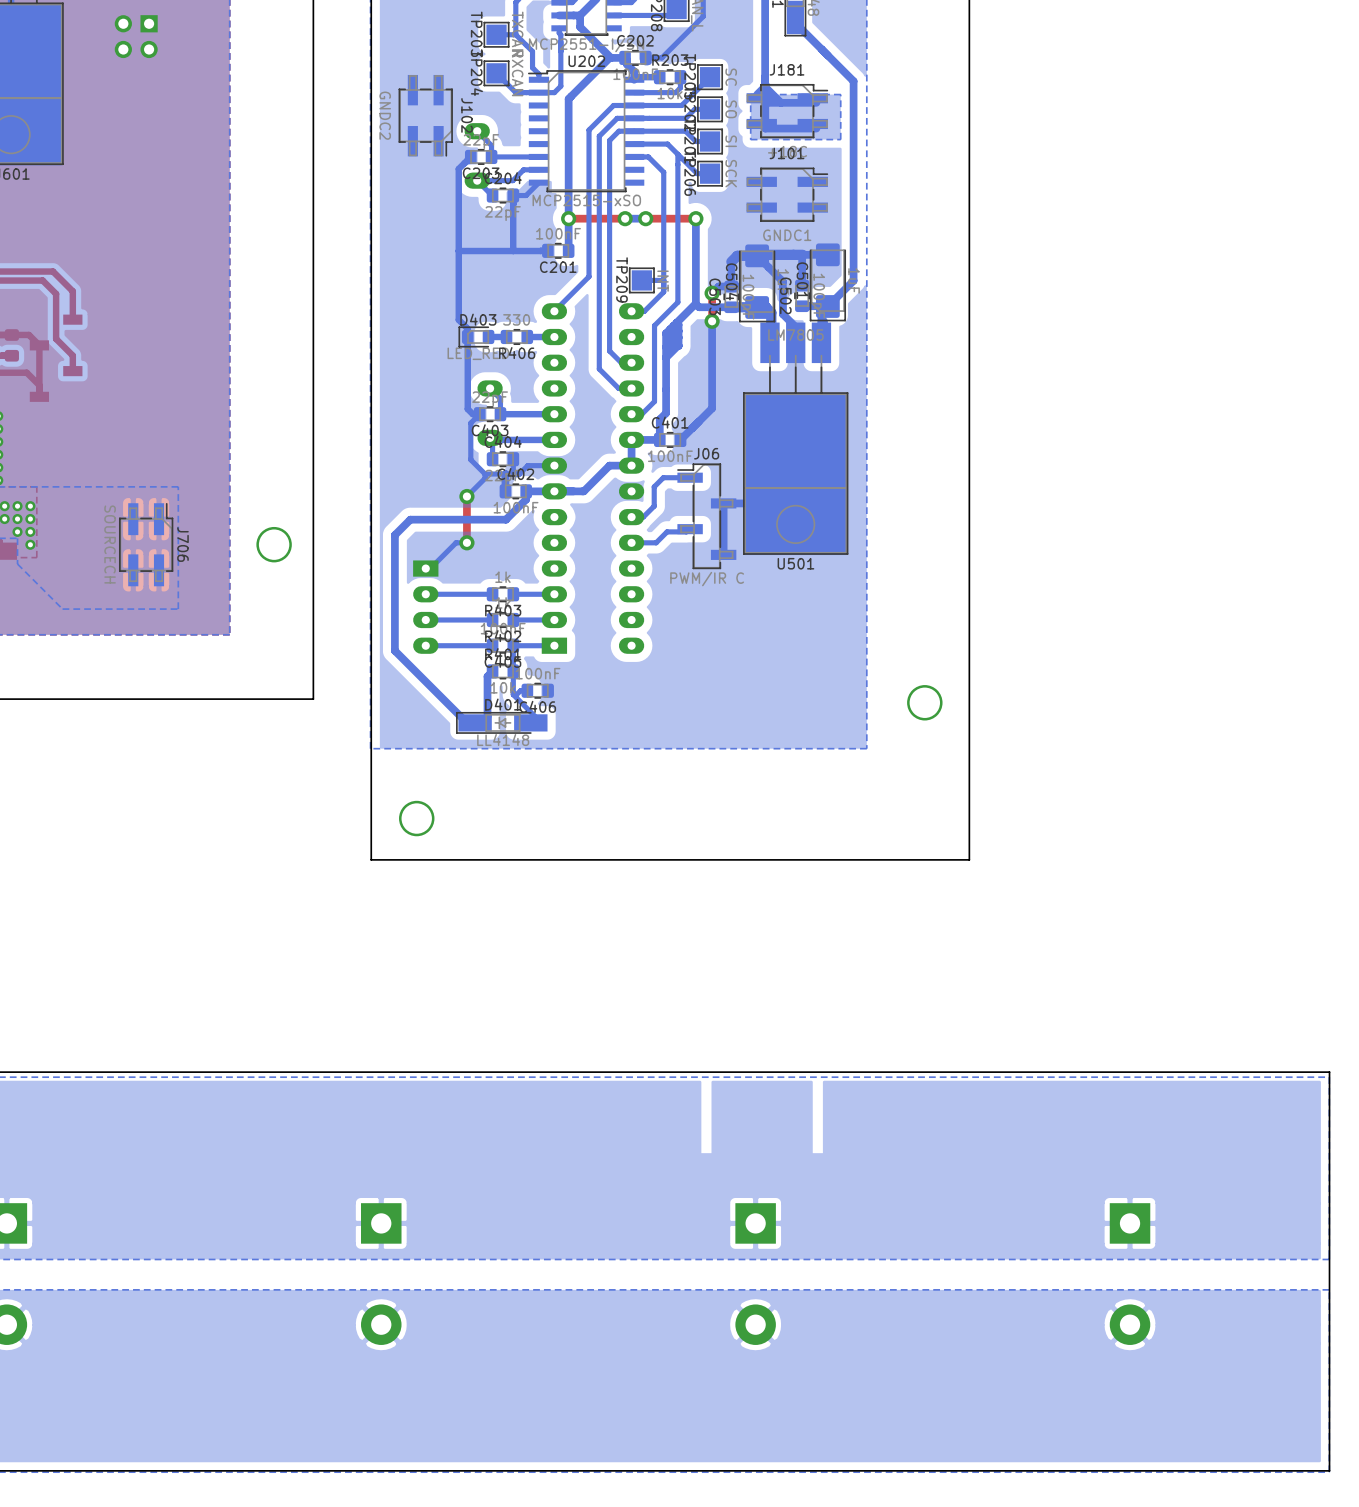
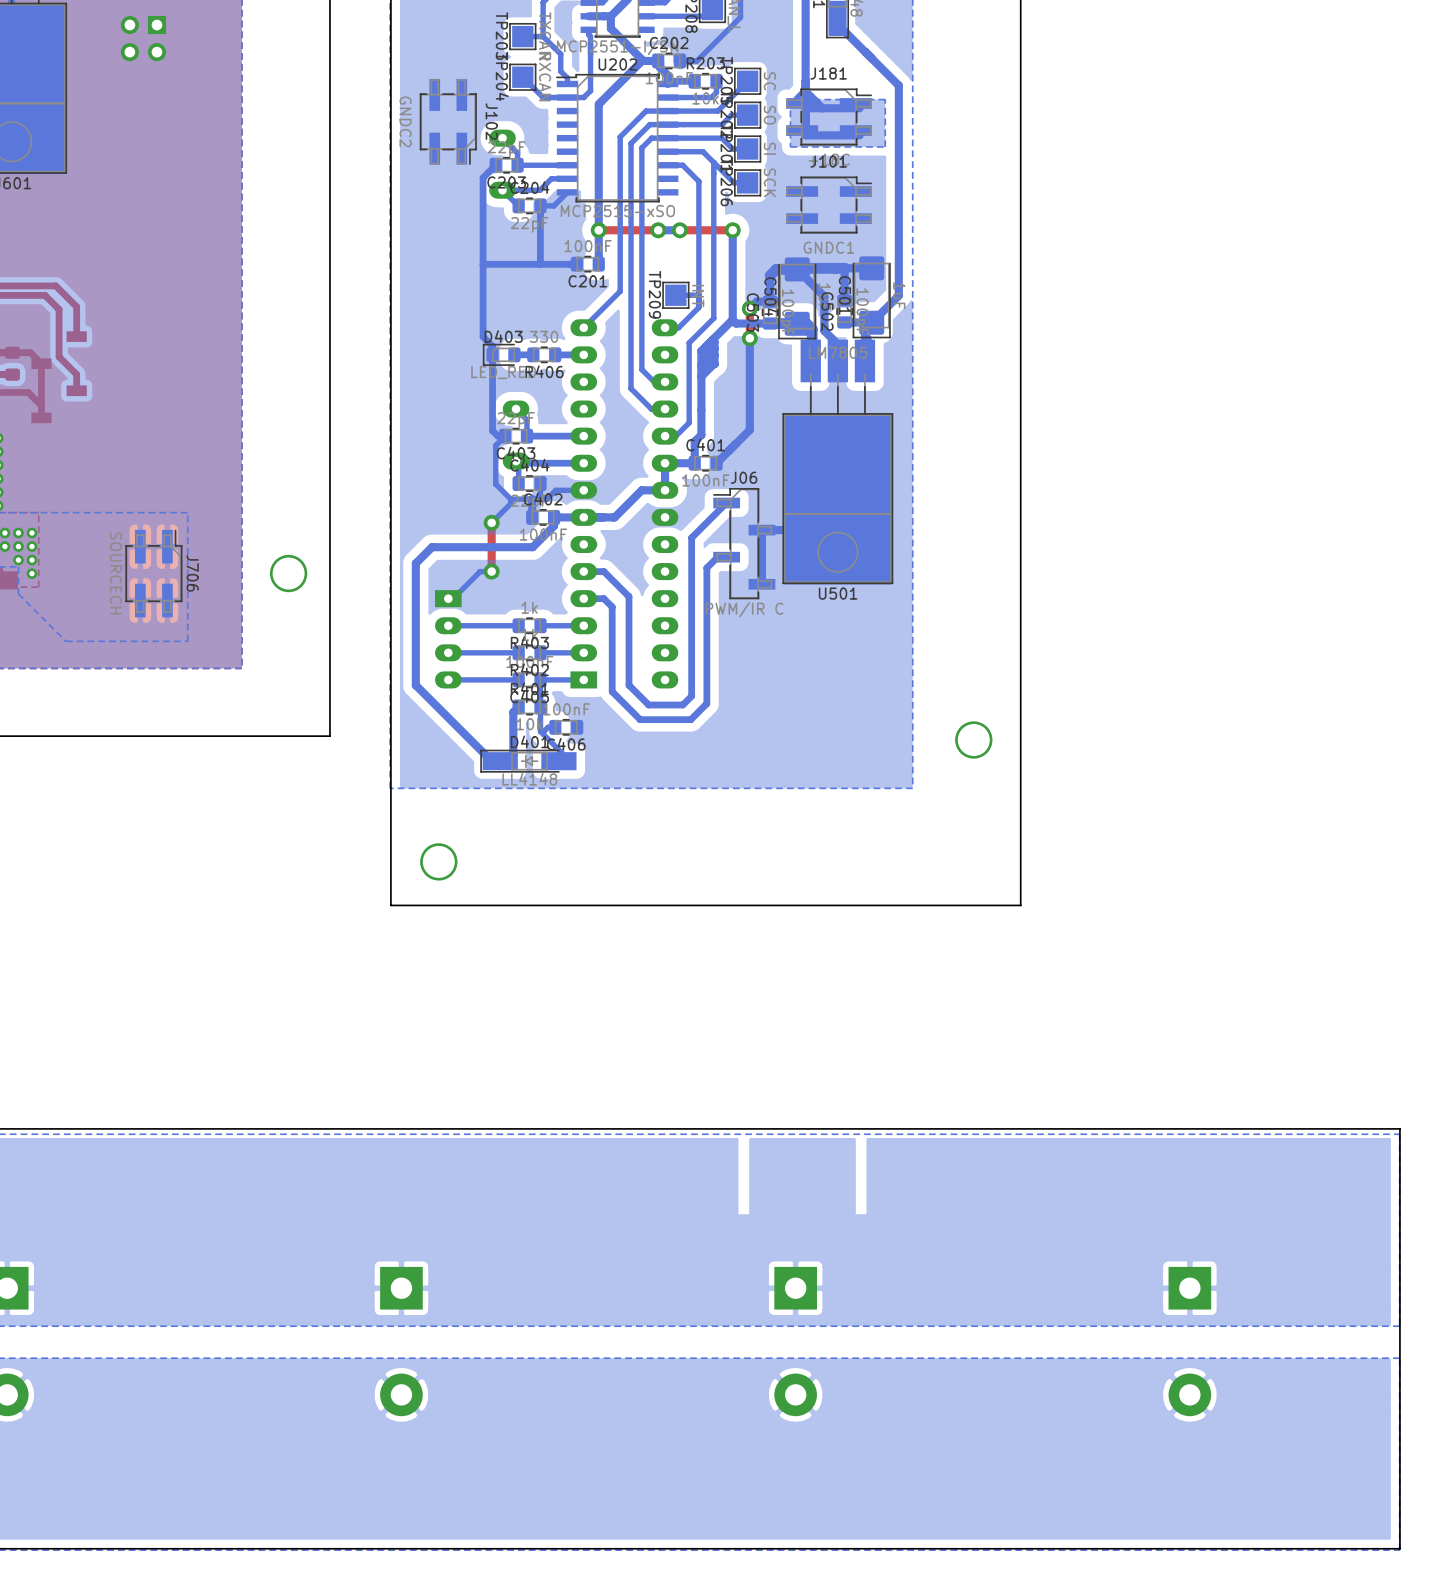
bottom track: (690, 477) (663, 477) (654, 486) (654, 506) (643, 517) (631, 517) -> (726, 503) (691, 537) (691, 696) (682, 704) (648, 704) (629, 685) (629, 596) (603, 571) (583, 571)
bottom track: (689, 529) (686, 531) (667, 531) (656, 542) (631, 542) -> (725, 557) (717, 557) (706, 567) (706, 703) (690, 719) (640, 719) (612, 691) (612, 606) (603, 598) (583, 598)

